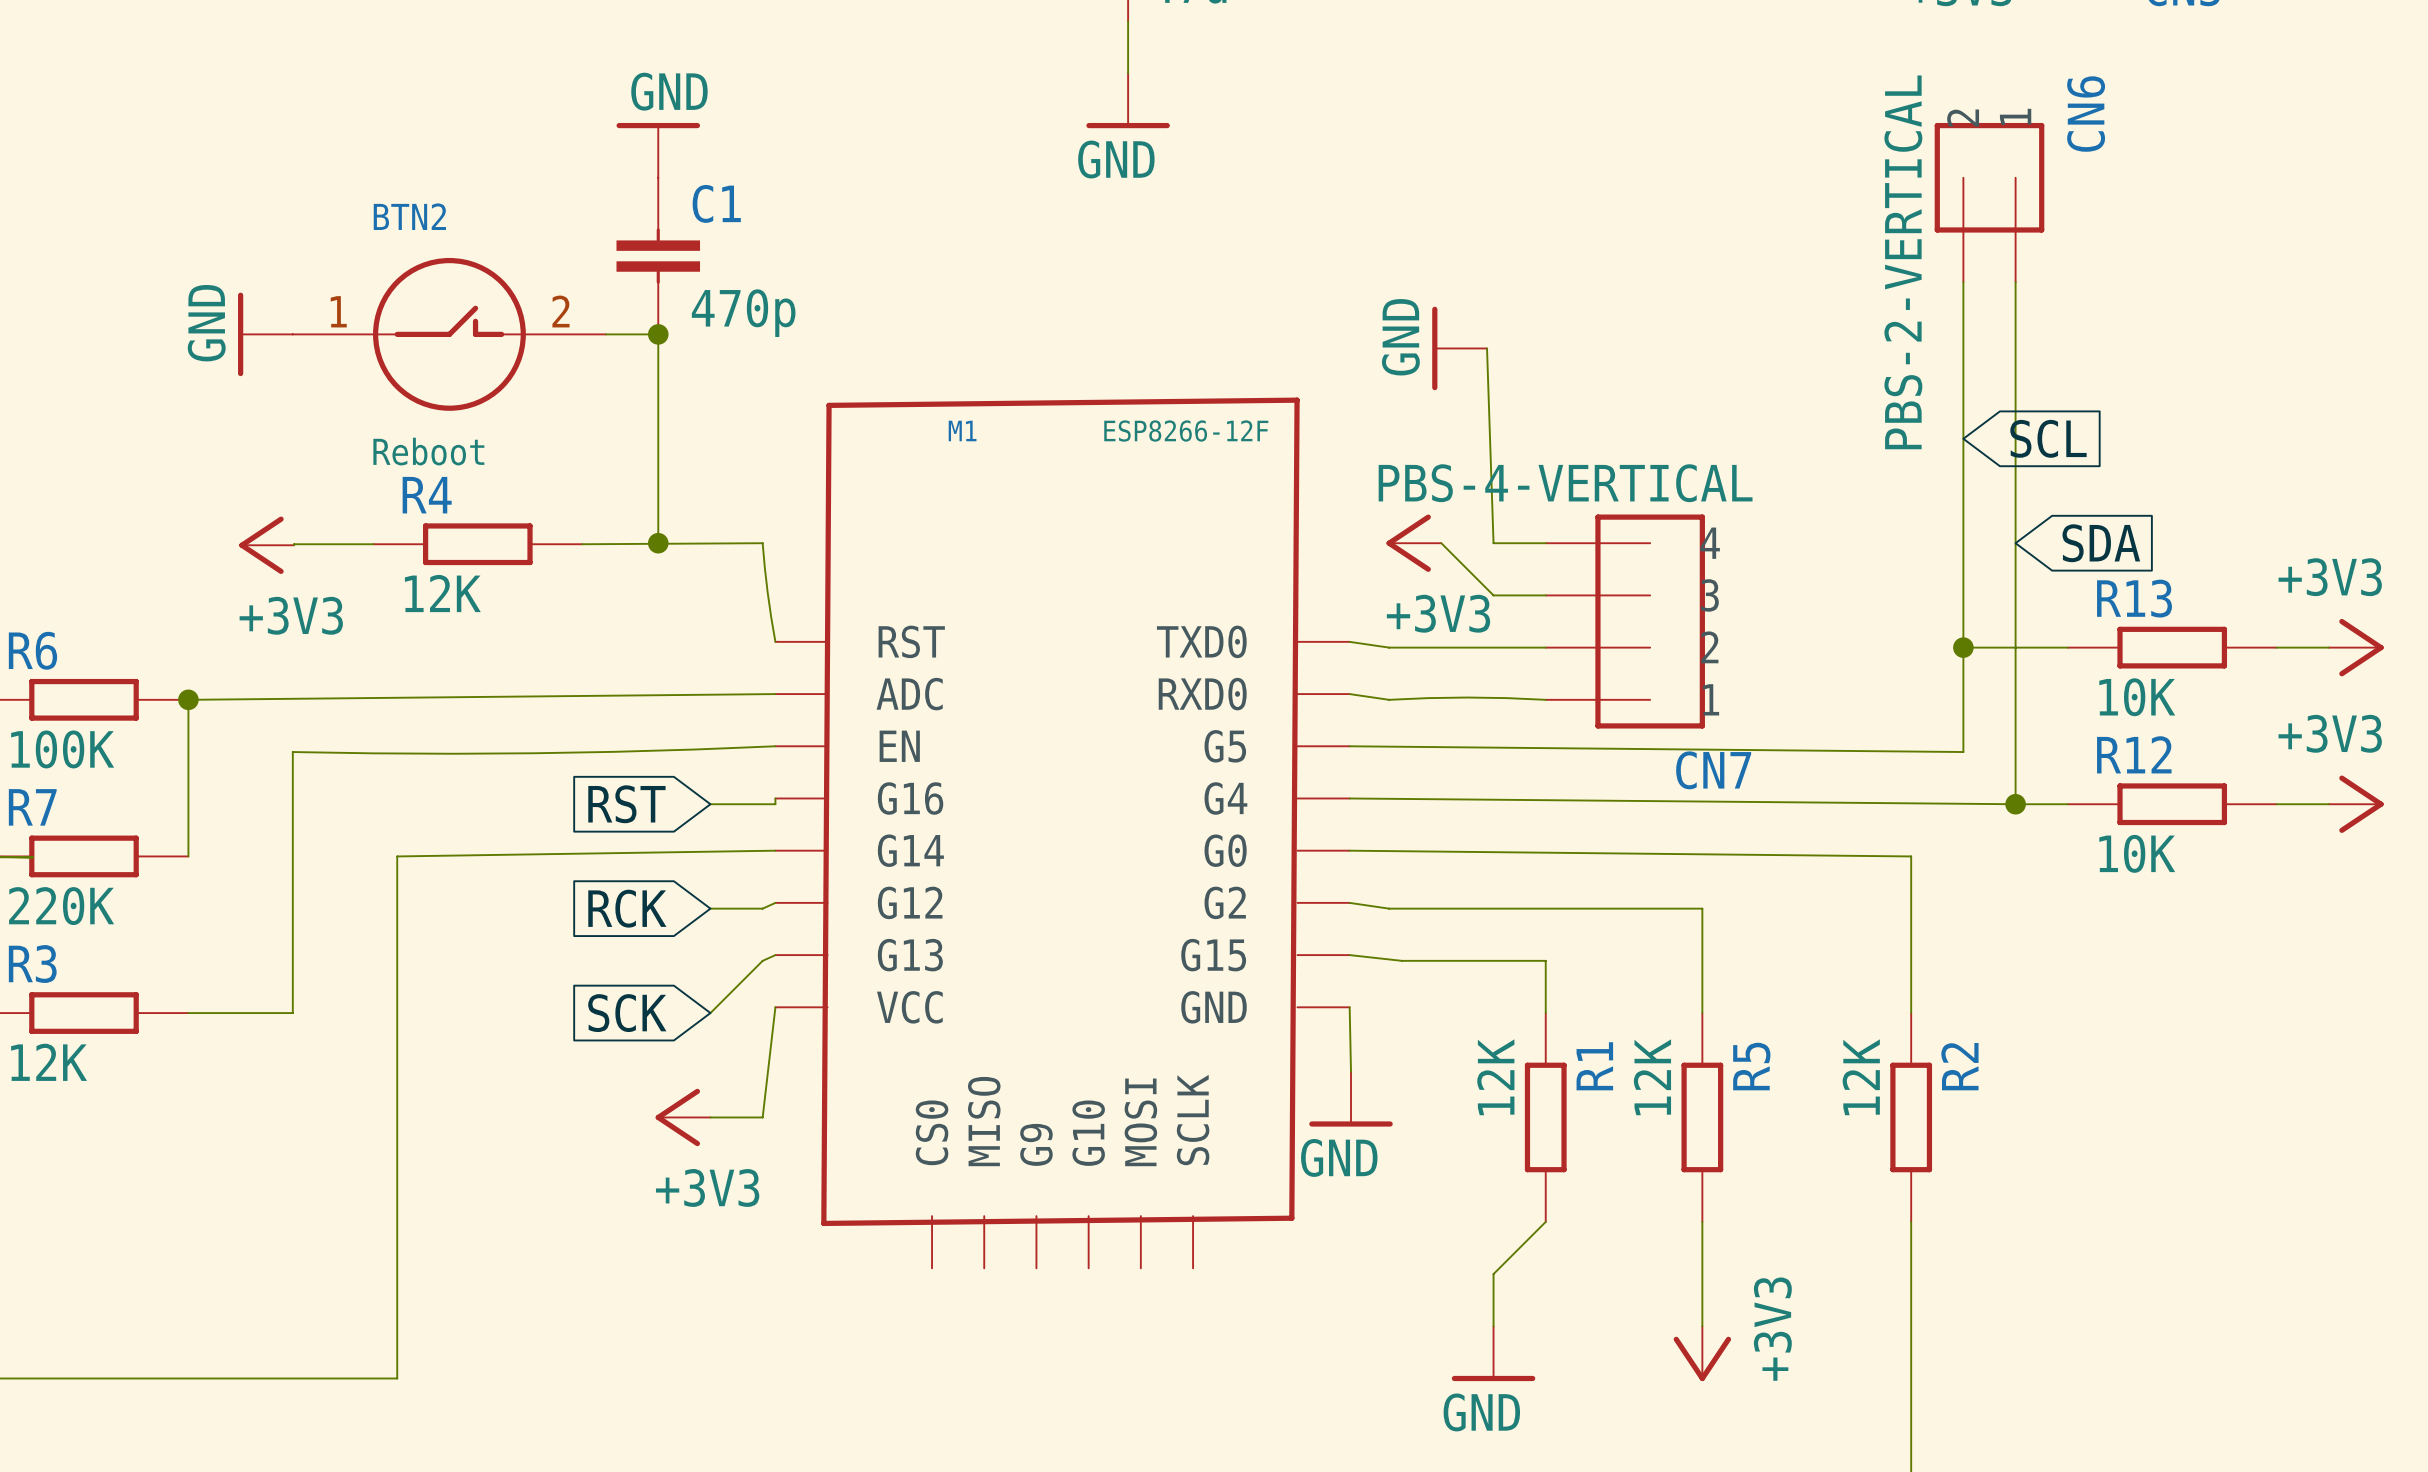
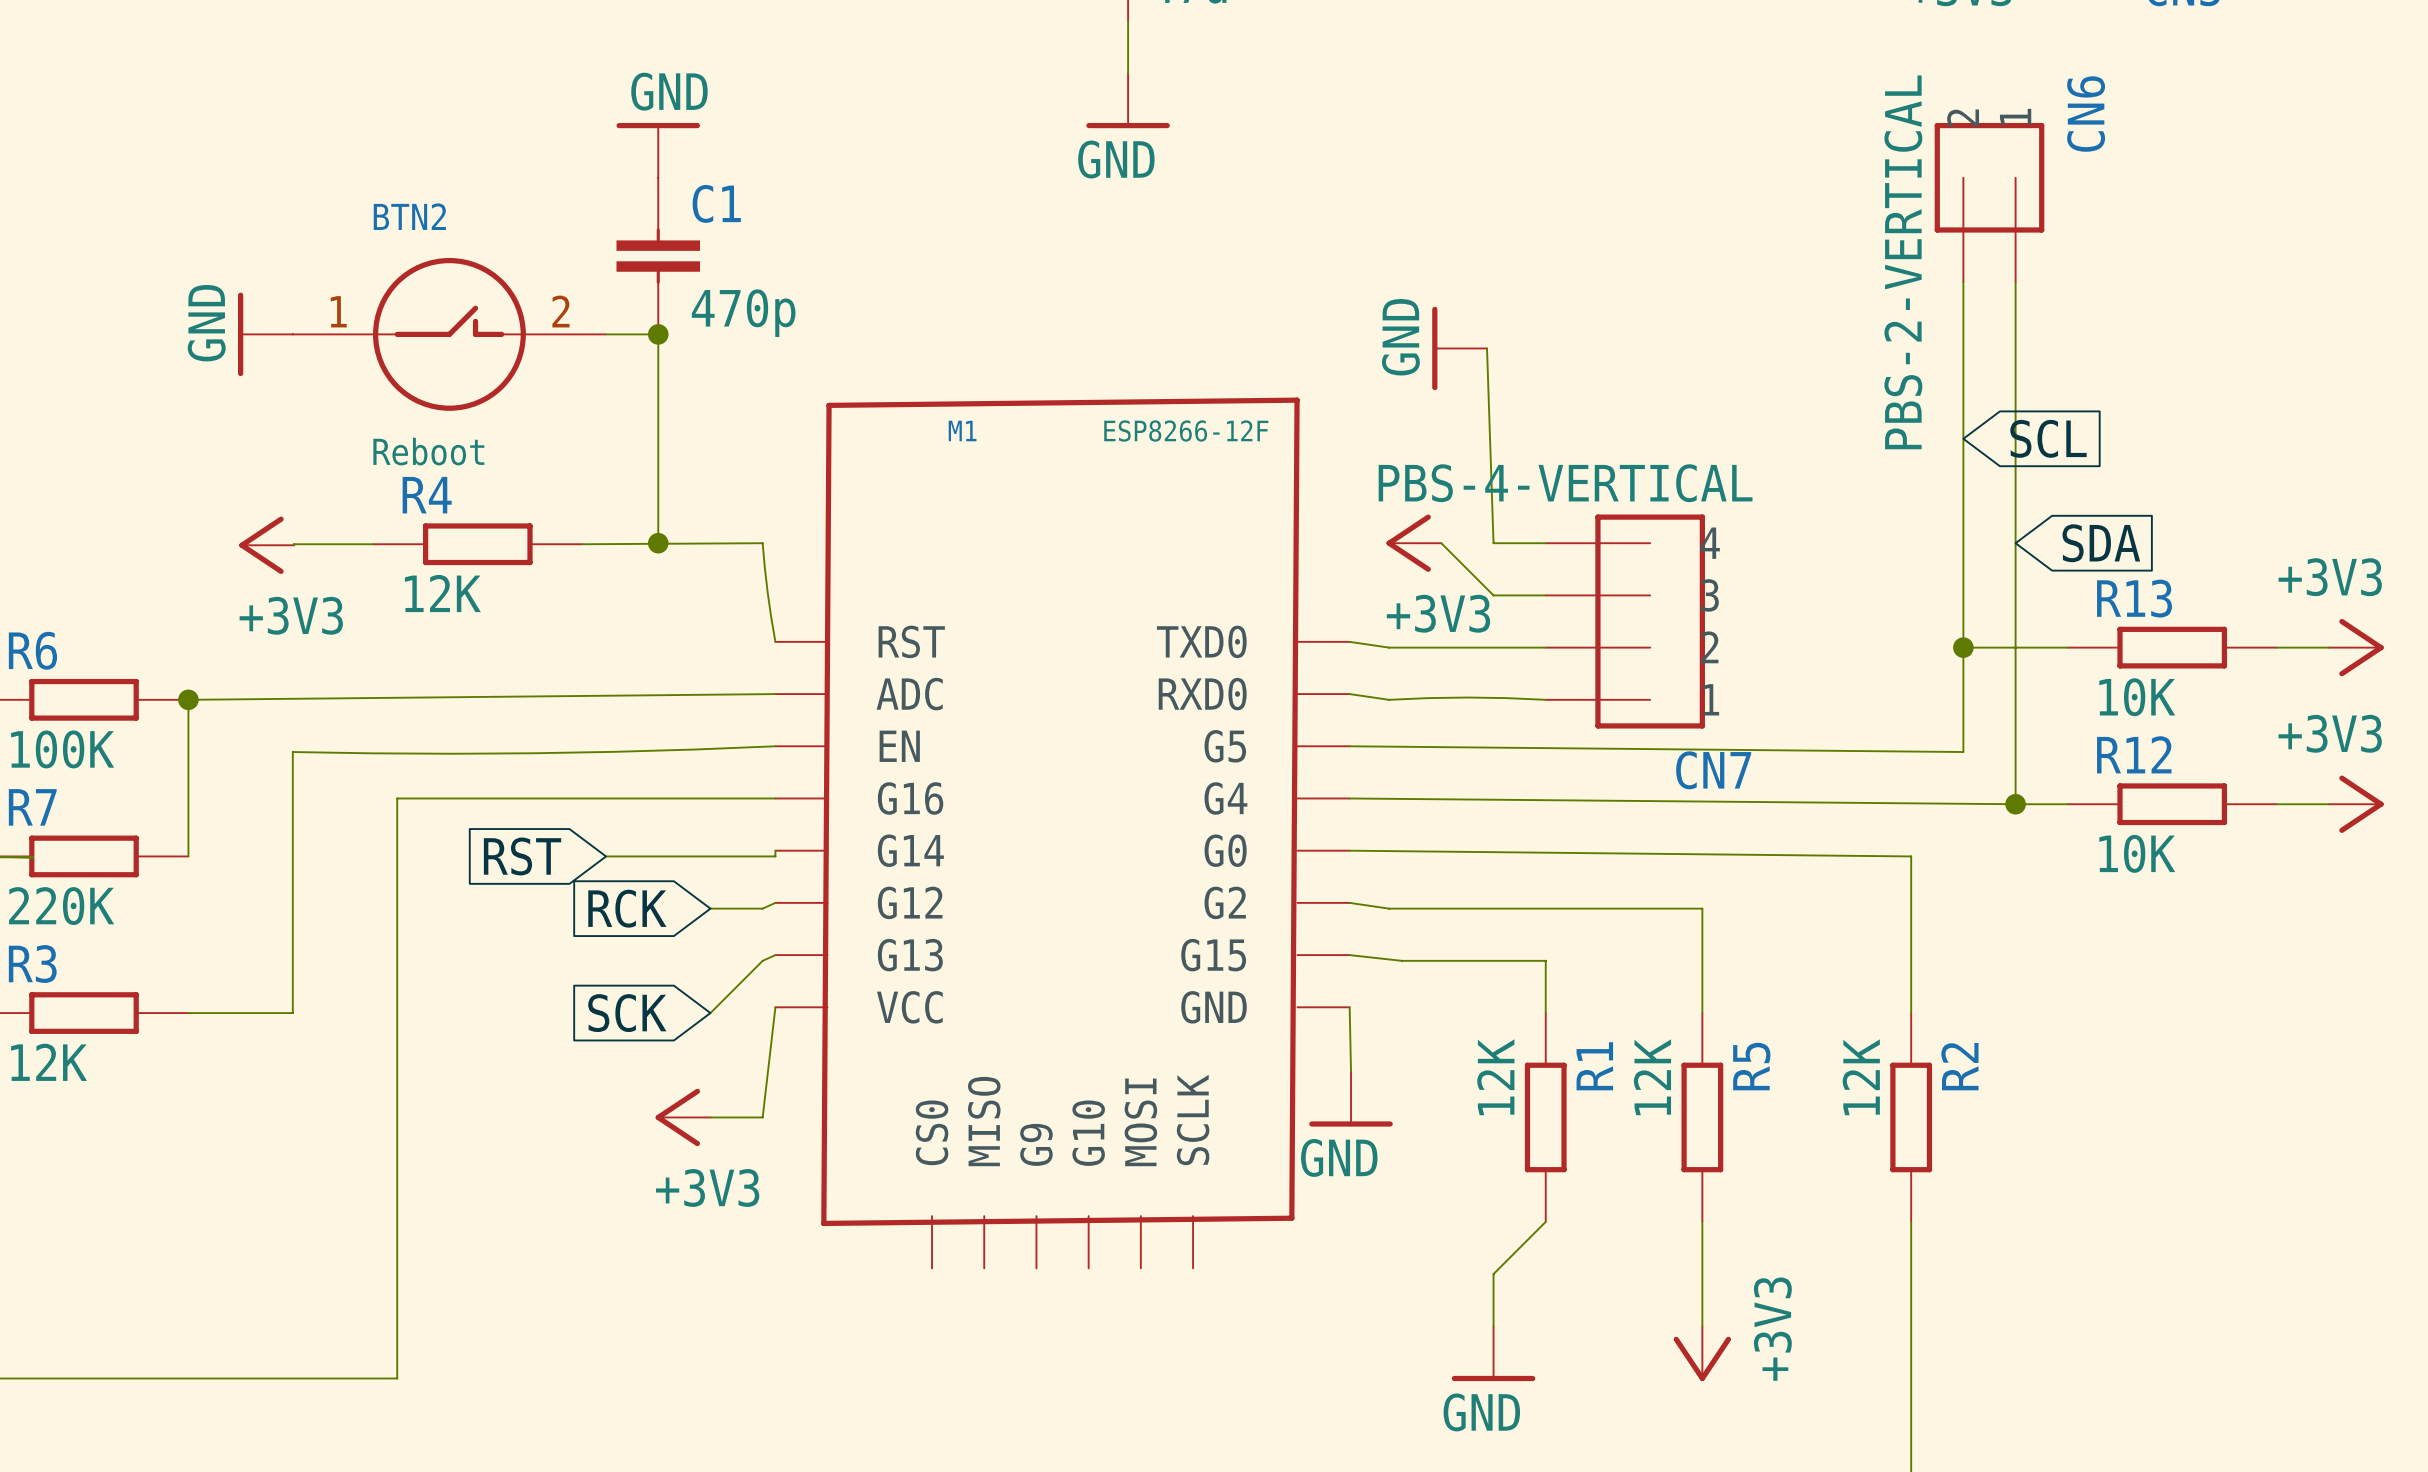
wire: (775, 798) (775, 804) (710, 804) -> none
global label position: RST (626, 804) -> RST (522, 856)
wire: (775, 850) (397, 856) -> (775, 798) (397, 798) (397, 856)
wire: none -> (775, 850) (775, 856) (606, 856)

